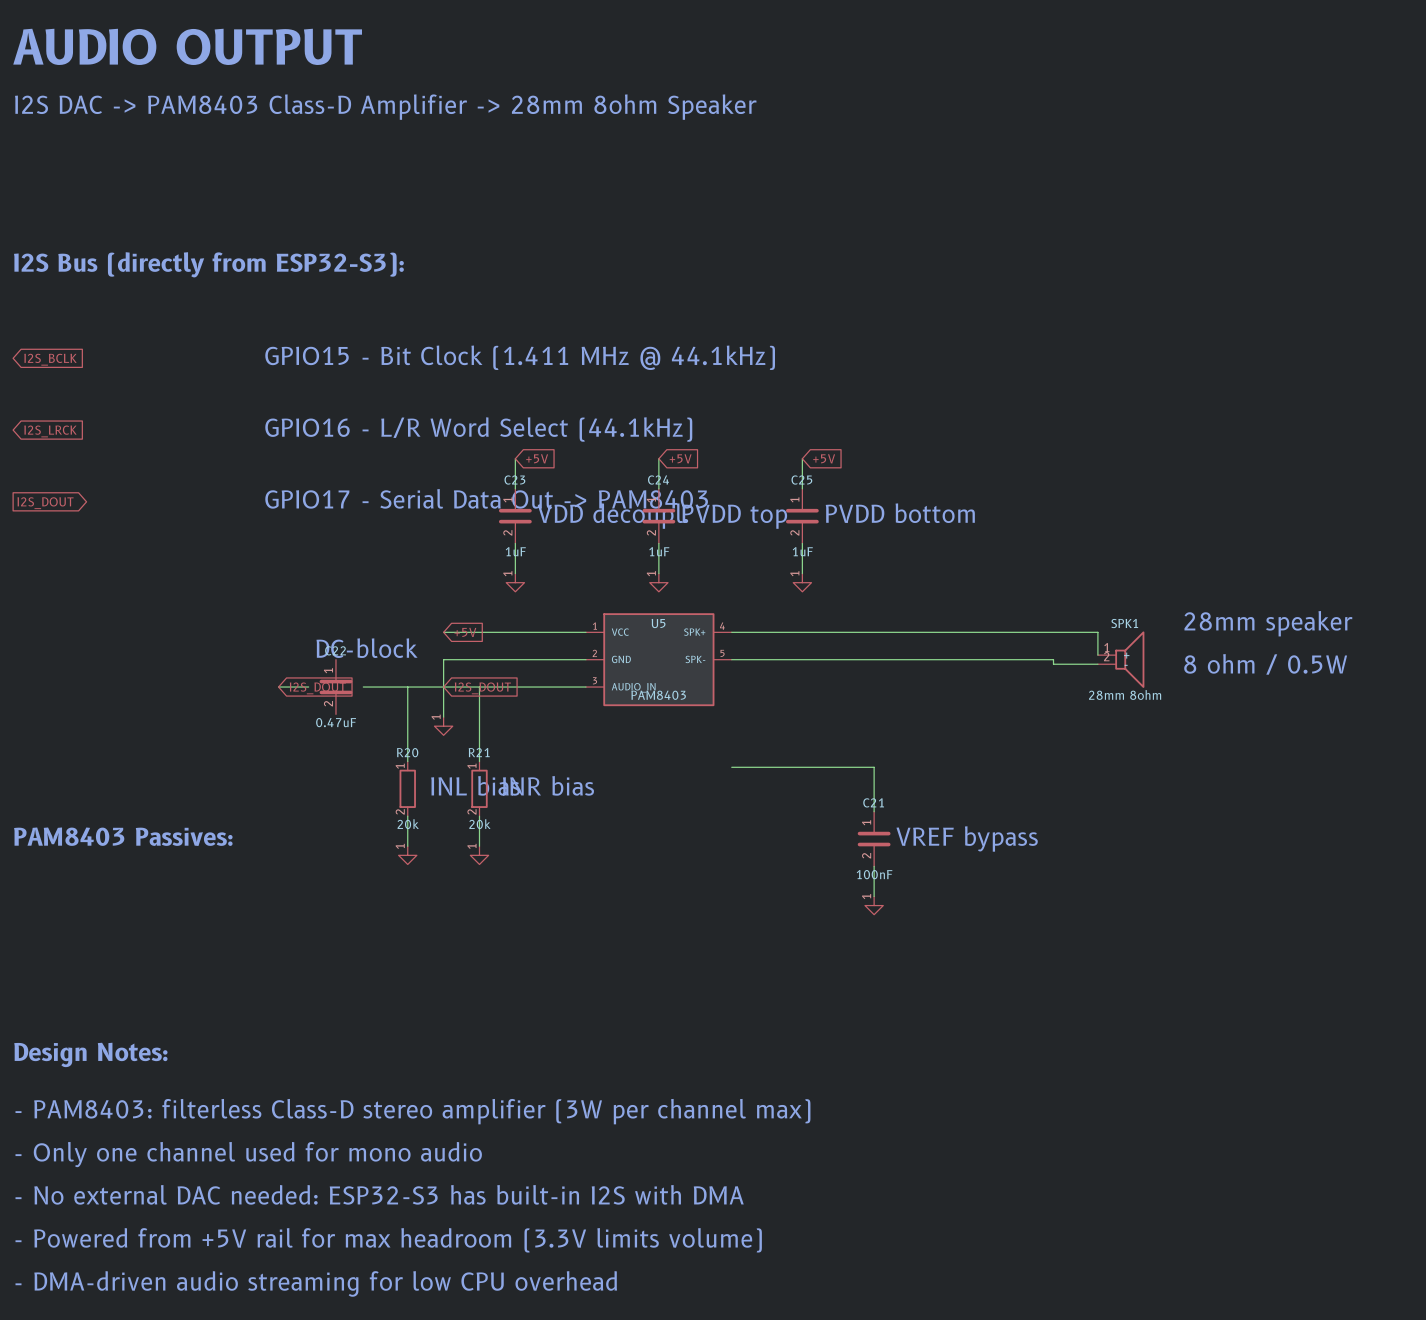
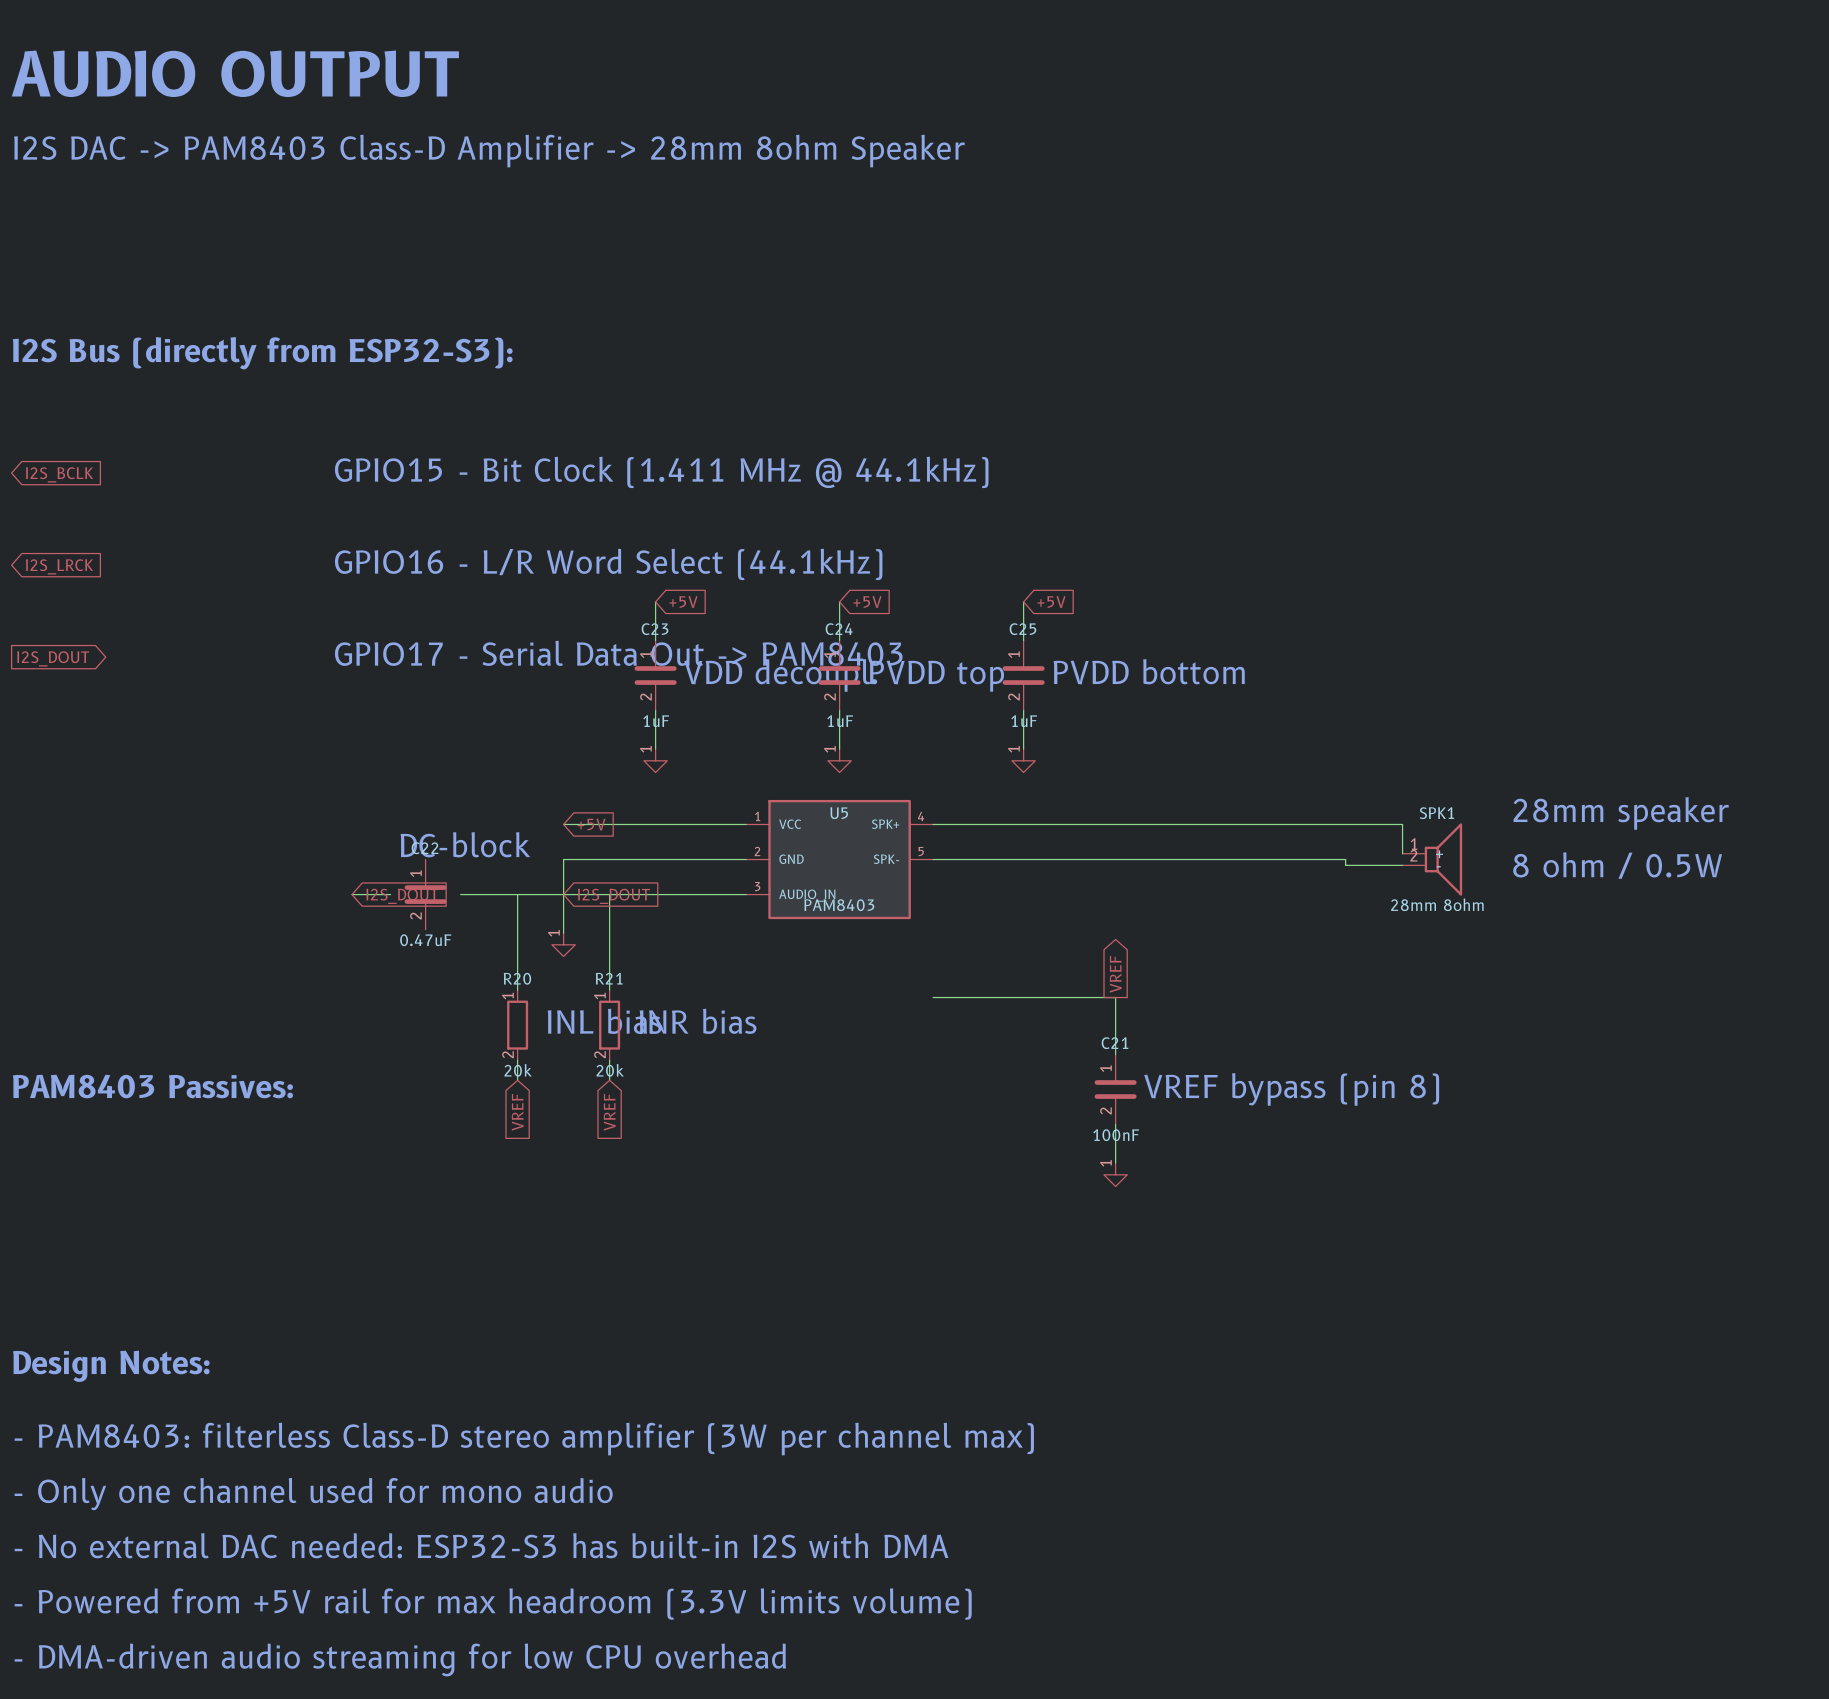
global label: none -> VREF (1115, 974)
wire: (407, 831) (407, 846) -> none
wire: (479, 831) (479, 846) -> none
text: VREF bypass (967, 838) -> VREF bypass (pin 8) (1291, 1089)
power symbol: (407, 855) -> none
power symbol: (479, 855) -> none
global label: none -> VREF (517, 1112)
global label: none -> VREF (609, 1112)

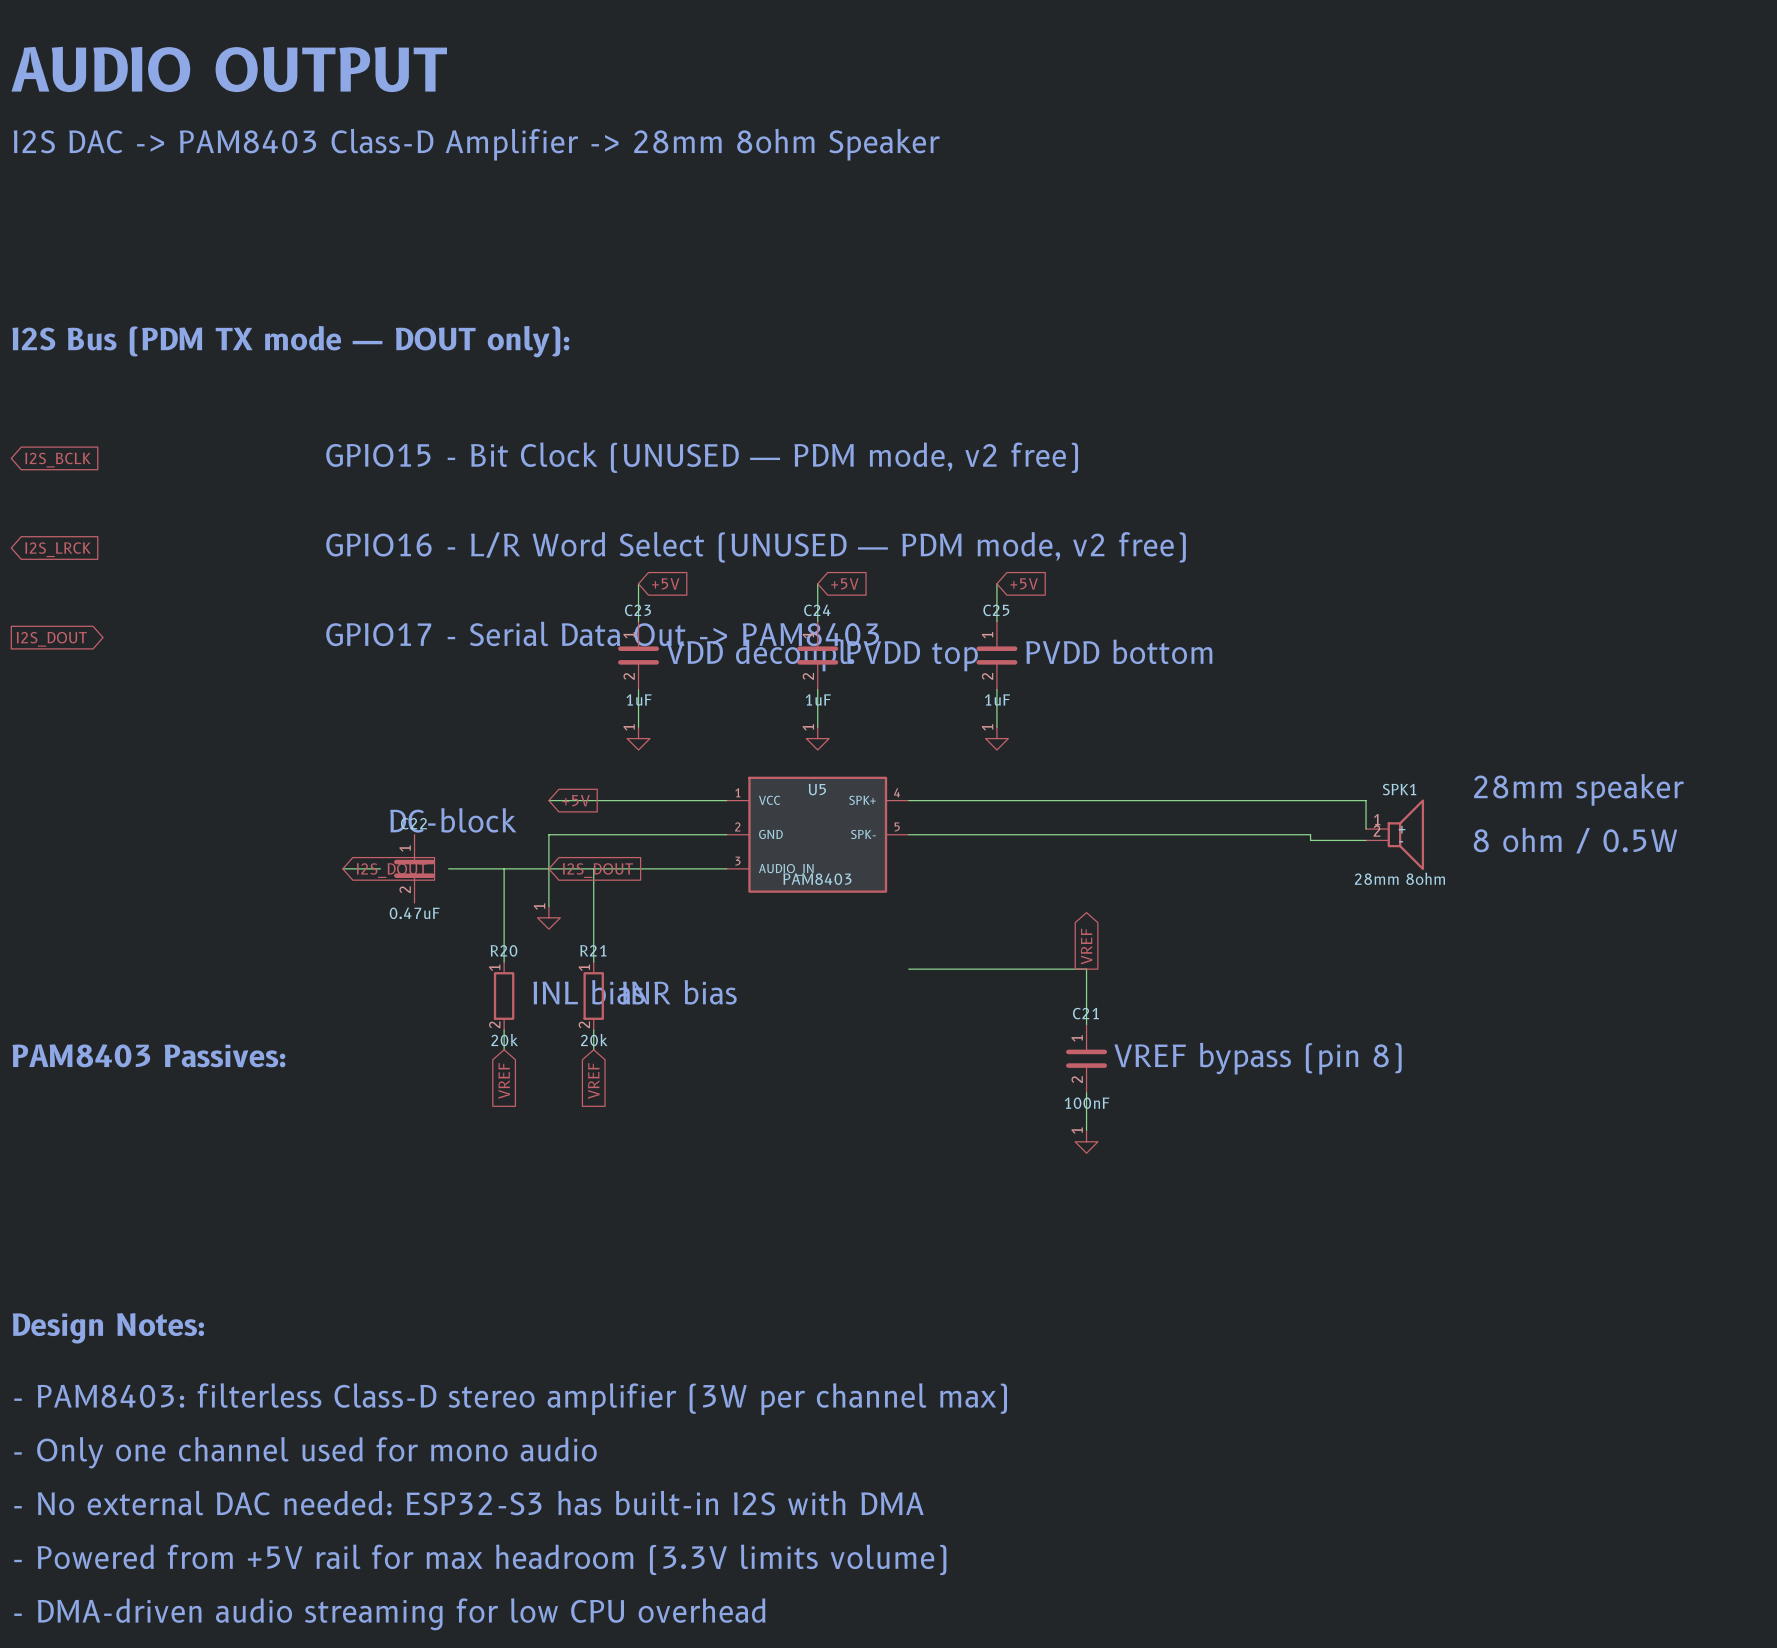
text: I2S Bus (directly from ESP32-S3): (262, 353) -> I2S Bus (PDM TX mode — DOUT only): (290, 341)
text: GPIO15 - Bit Clock (1.411 MHz @ 44.1kHz) (661, 472) -> GPIO15 - Bit Clock (UNUSED — PDM mode, v2 free) (702, 457)
text: GPIO16 - L/R Word Select (44.1kHz) (608, 564) -> GPIO16 - L/R Word Select (UNUSED — PDM mode, v2 free) (756, 547)

